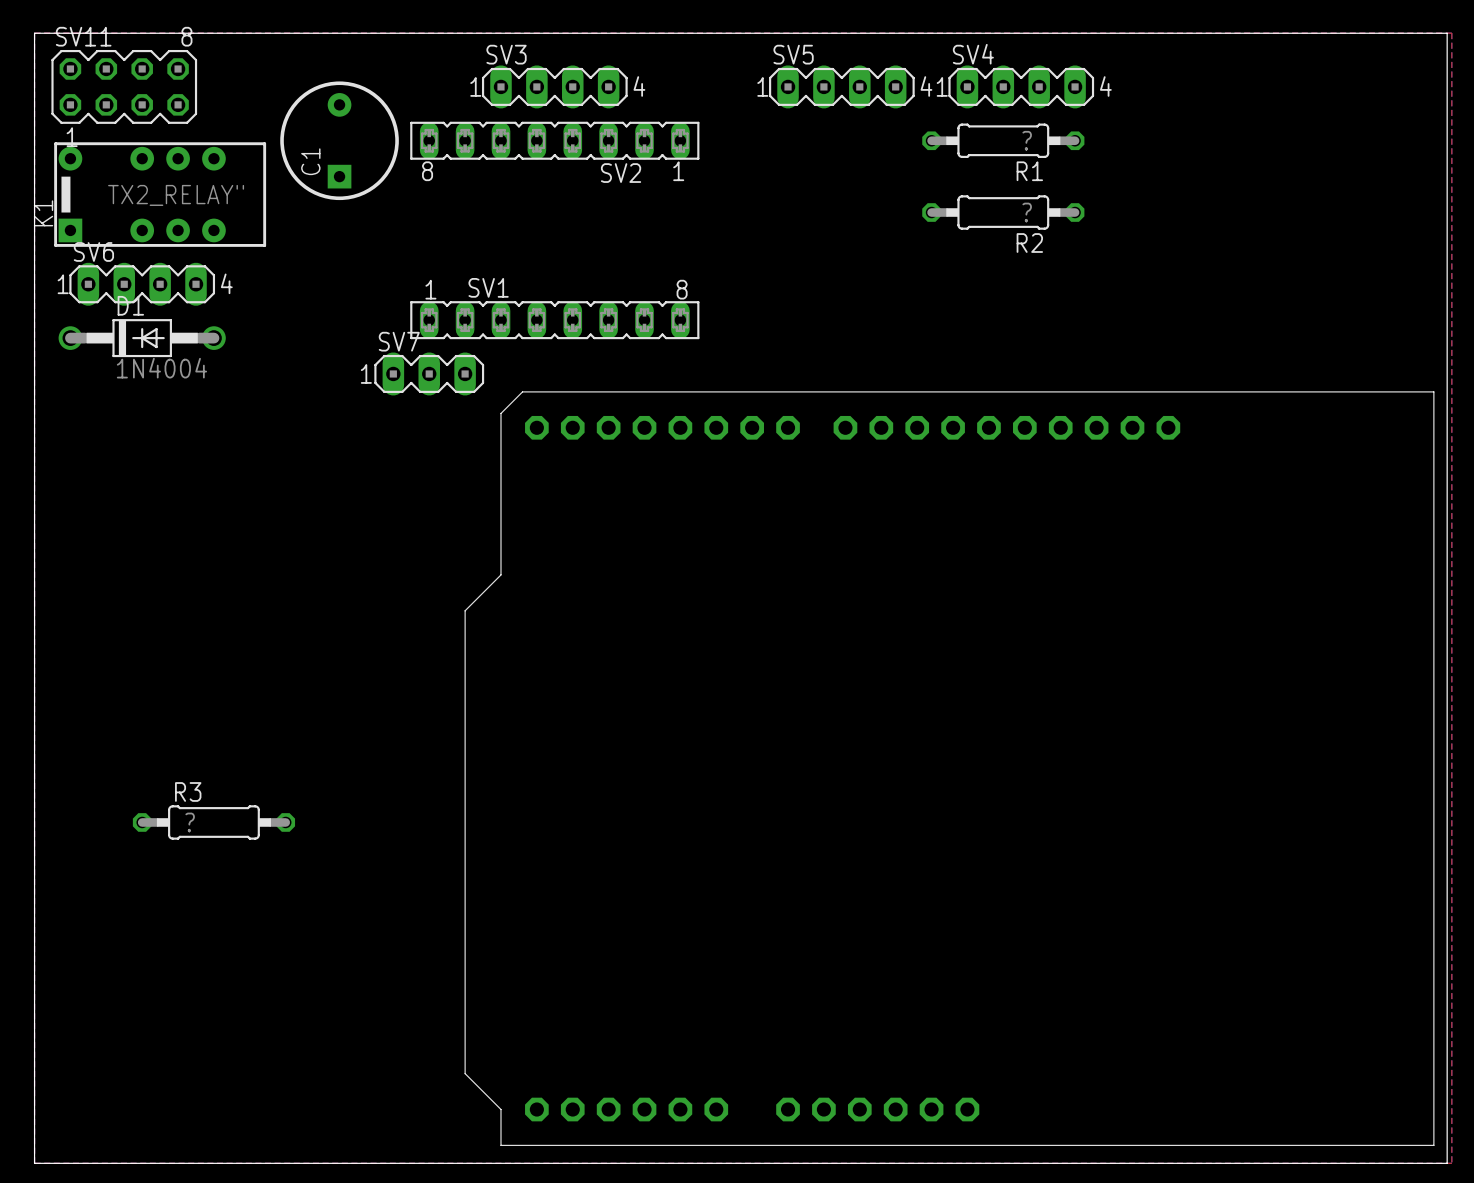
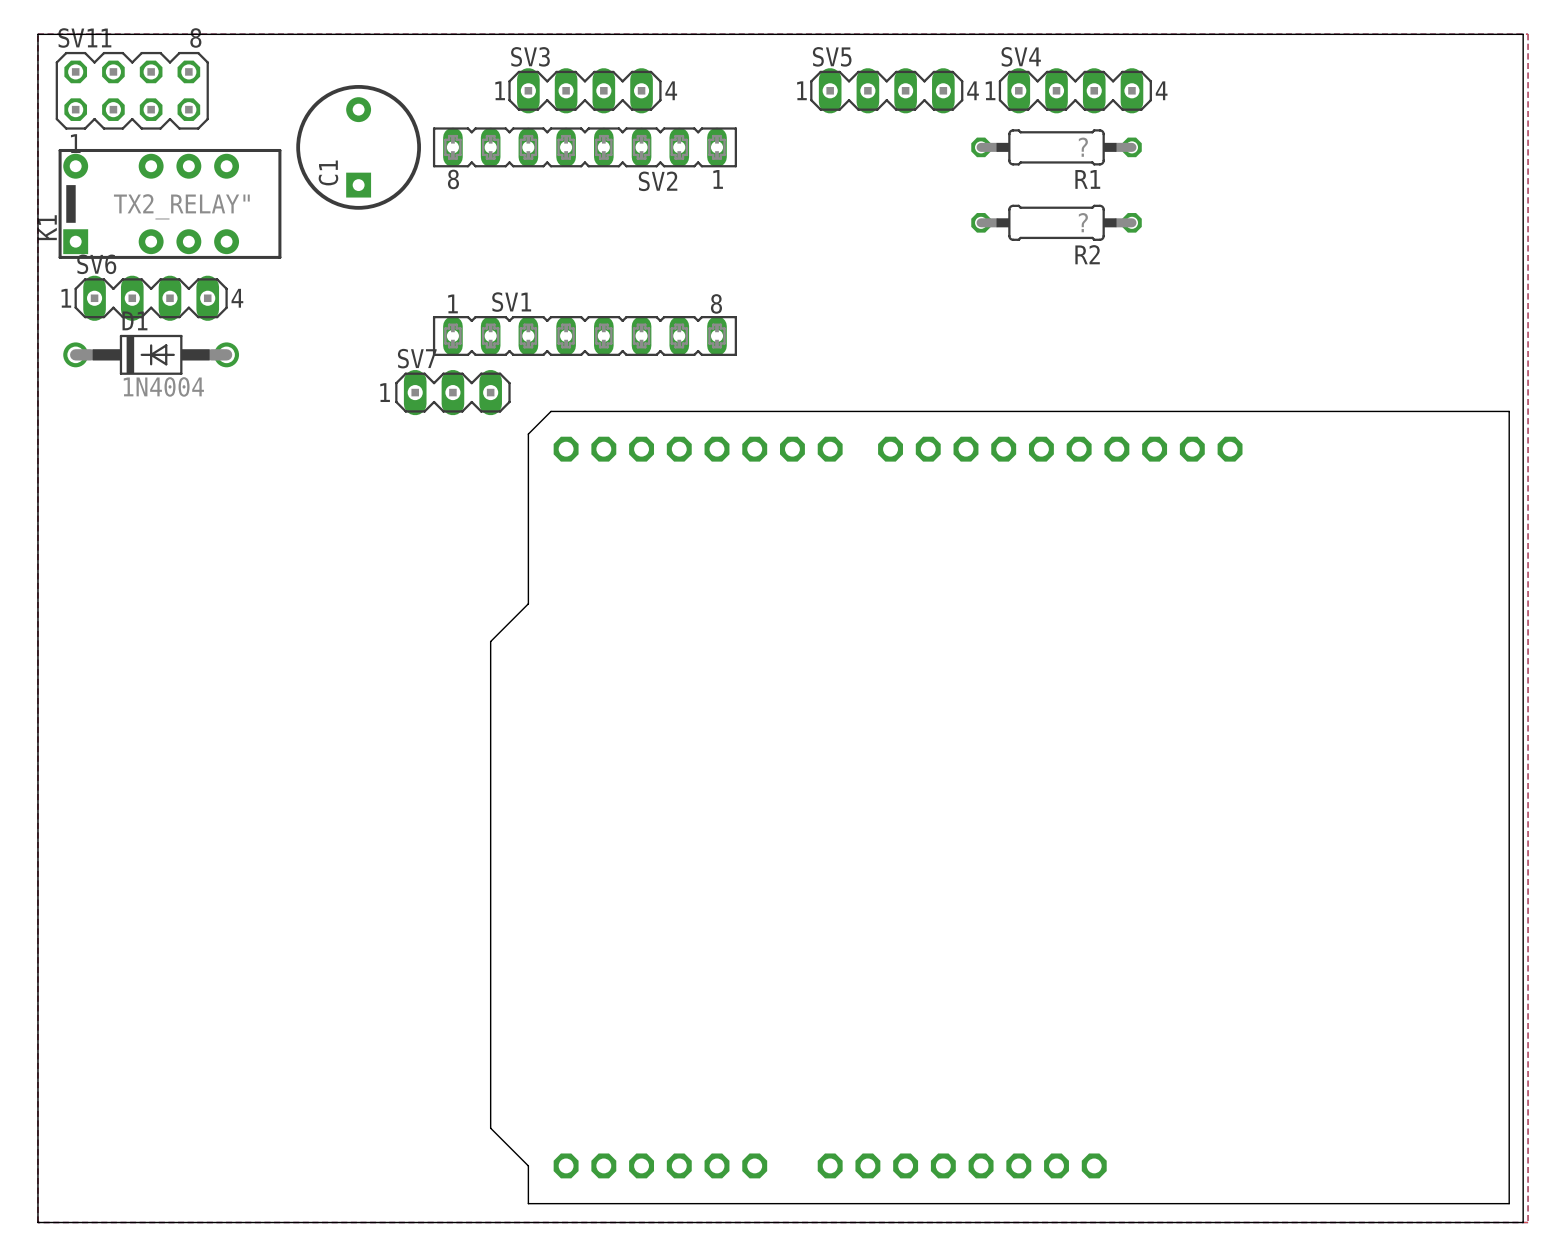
part footprint: [465, 391, 1434, 1146] -> [490, 411, 1510, 1204]
R3: ? (213, 822) -> none

